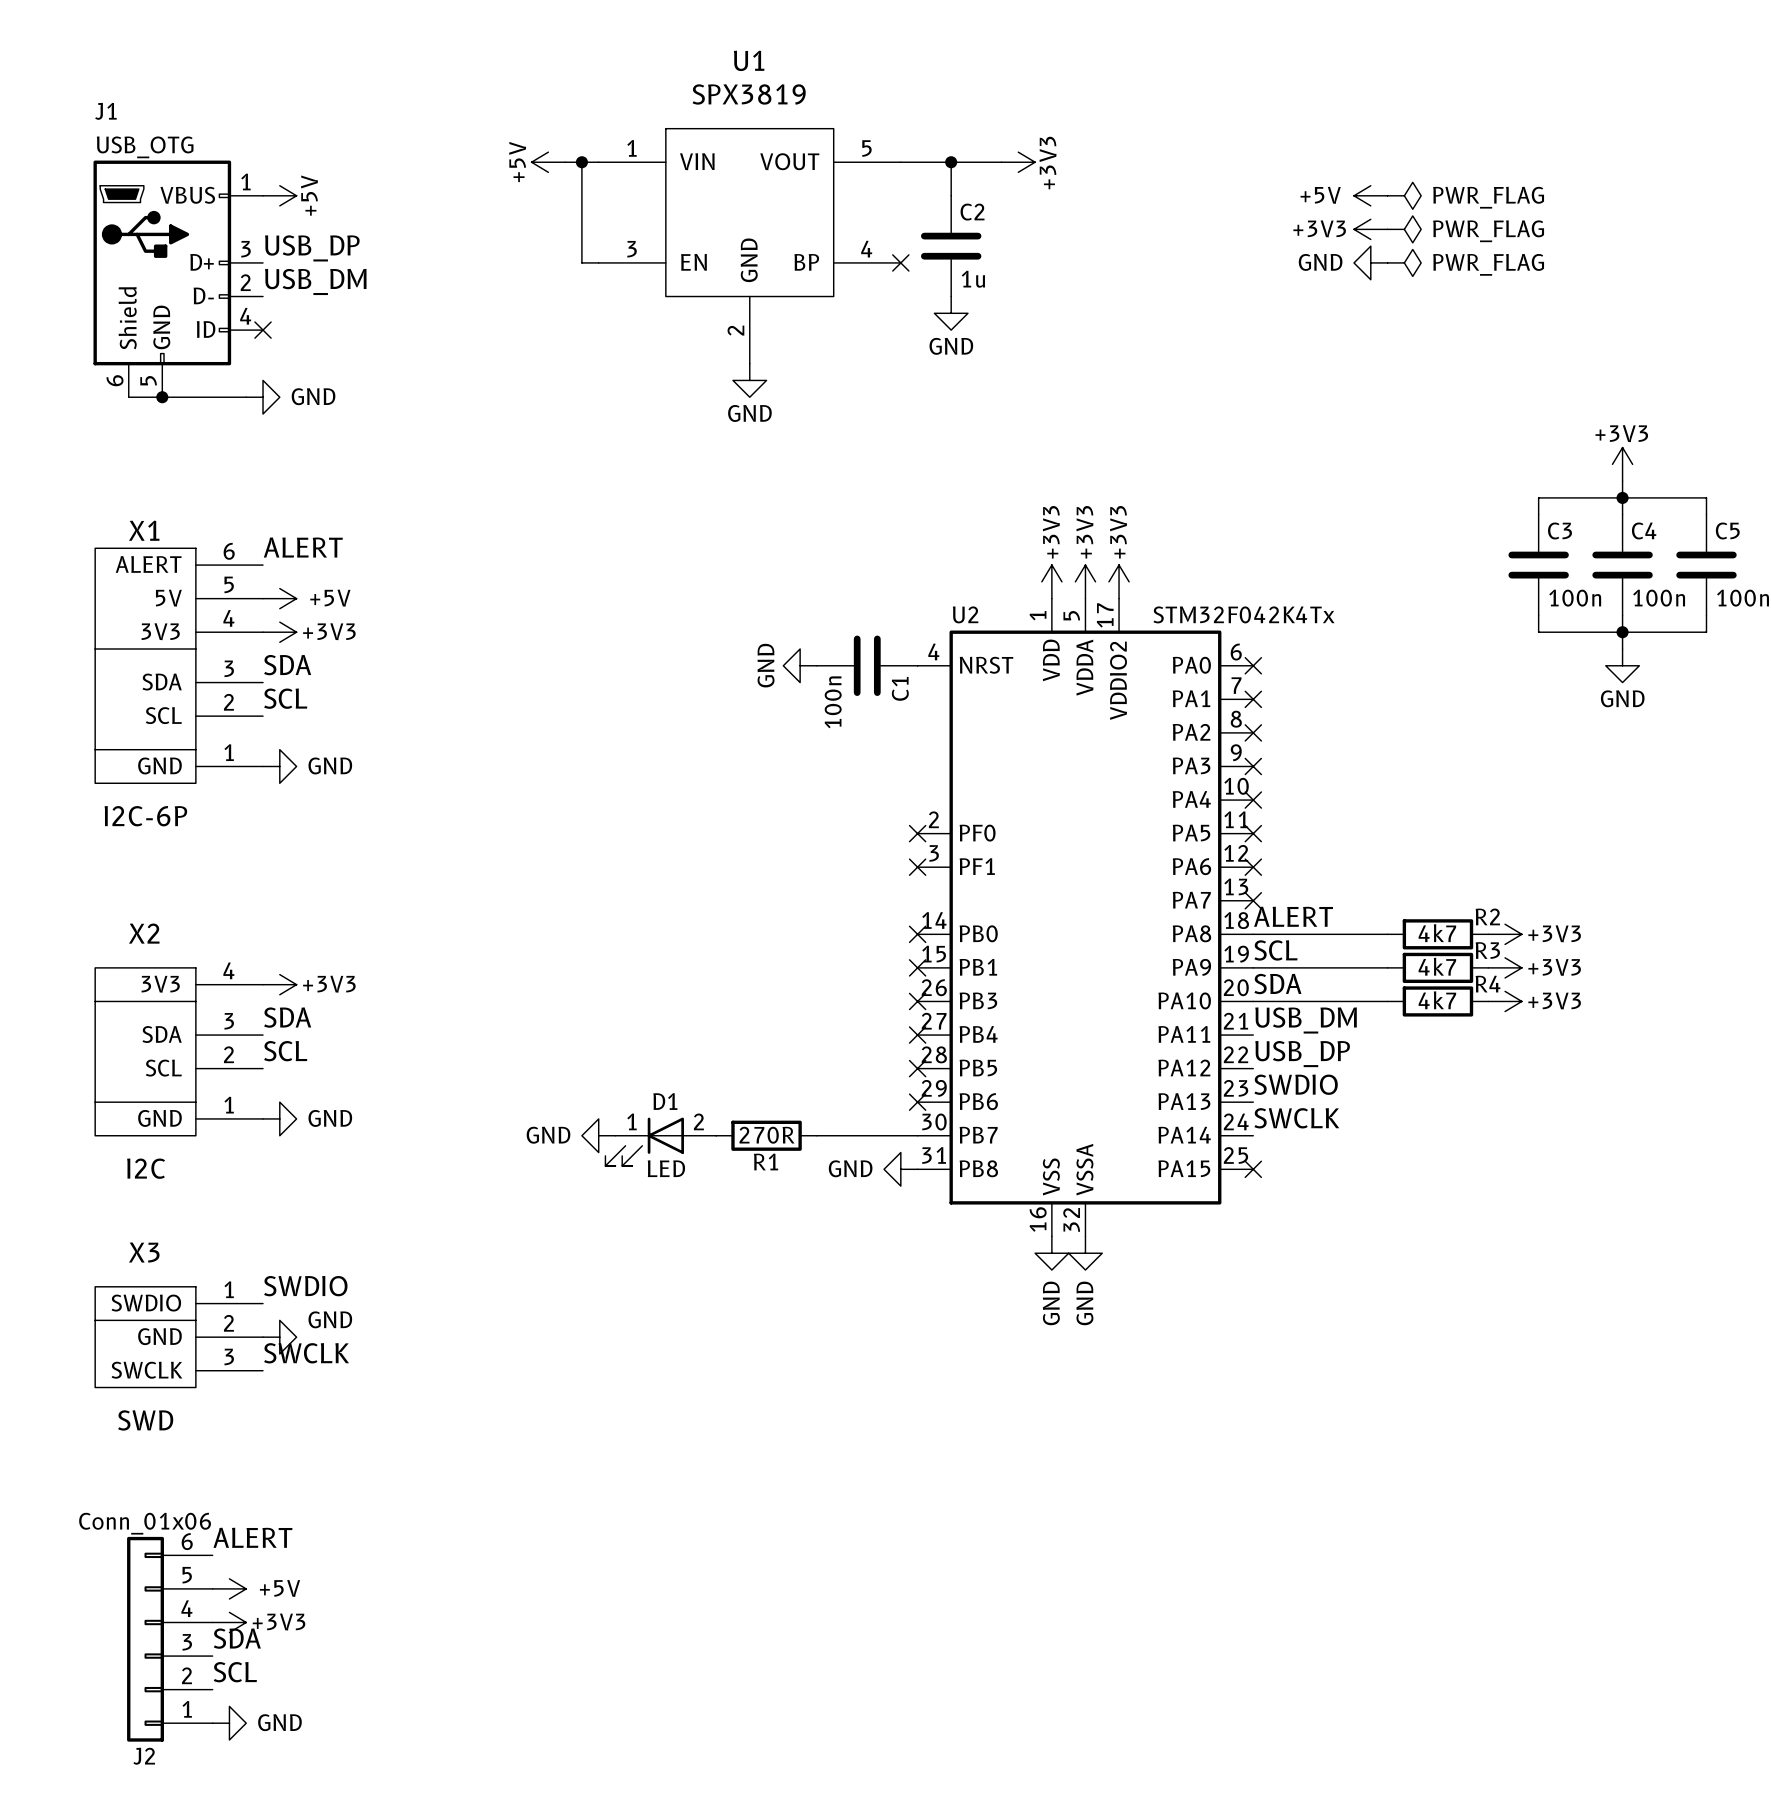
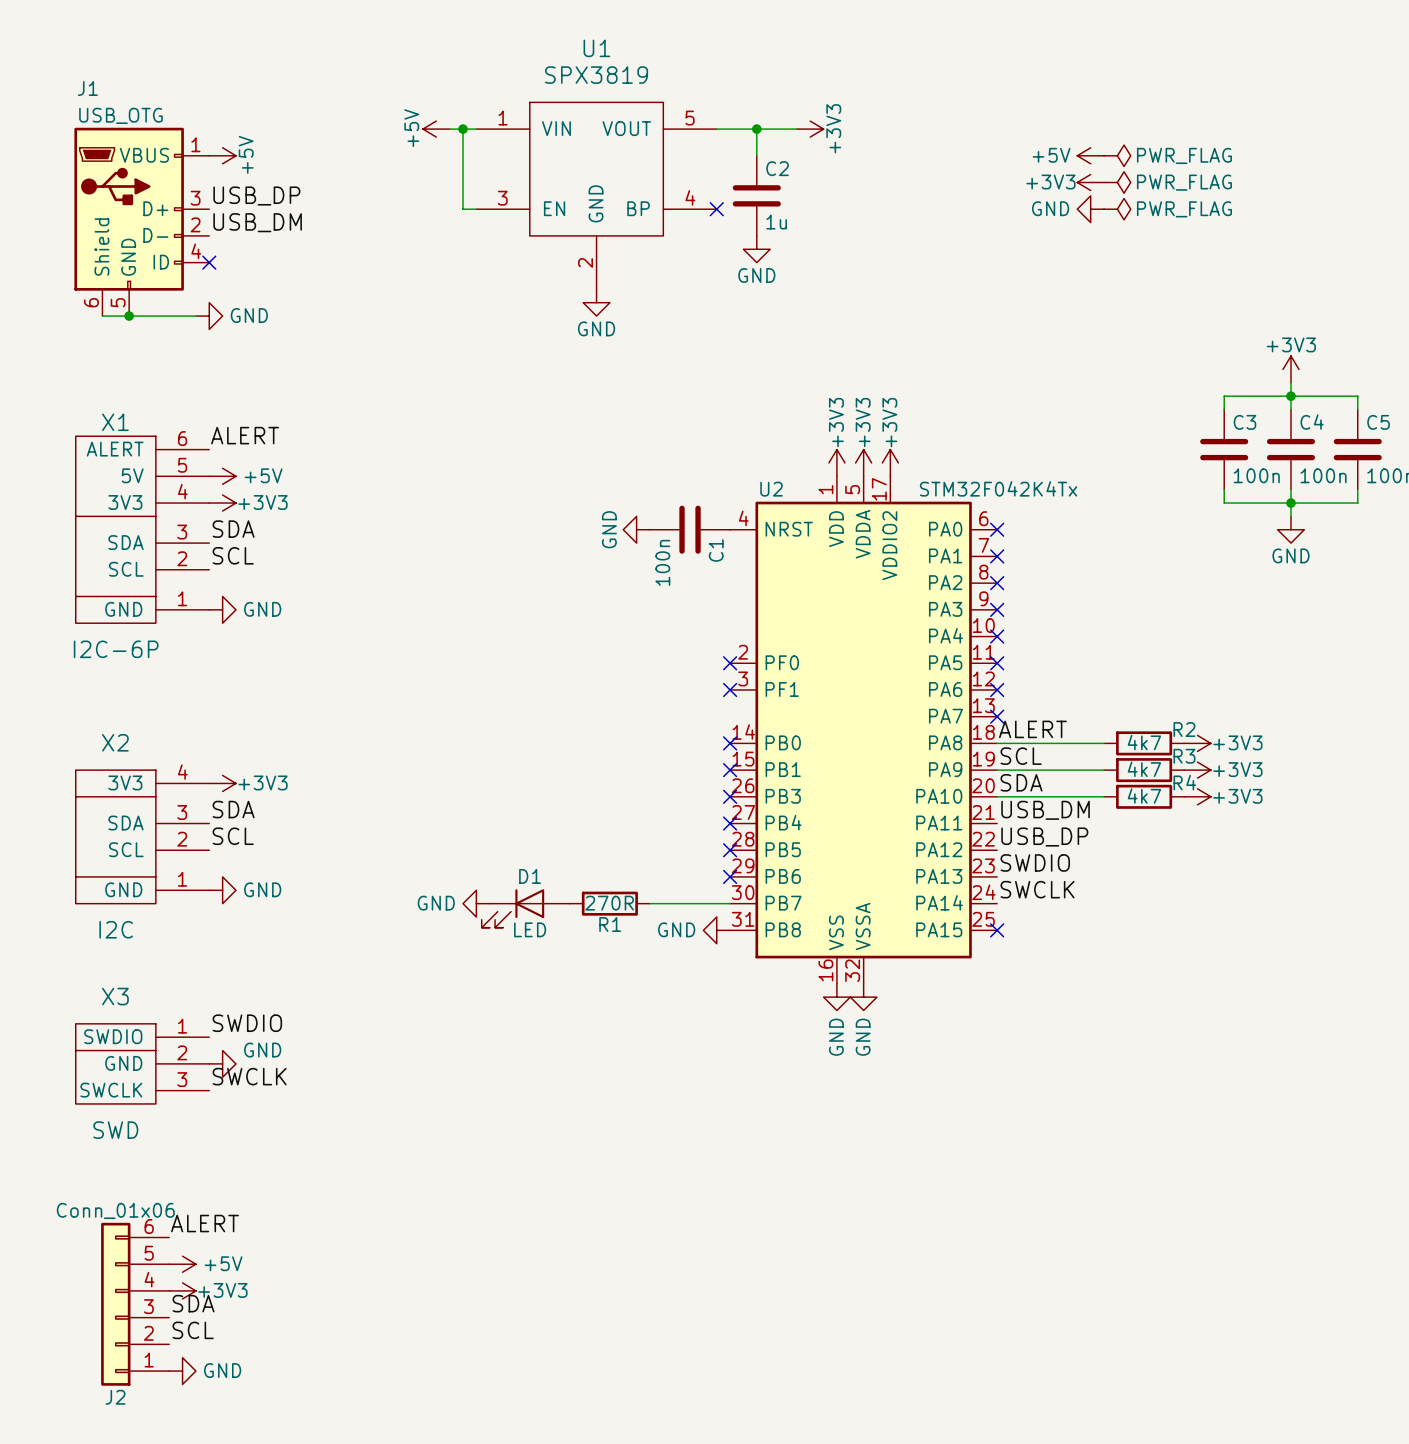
D1 pin number: 1 (631, 1121) -> none
D1 pin number: 2 (698, 1121) -> none

